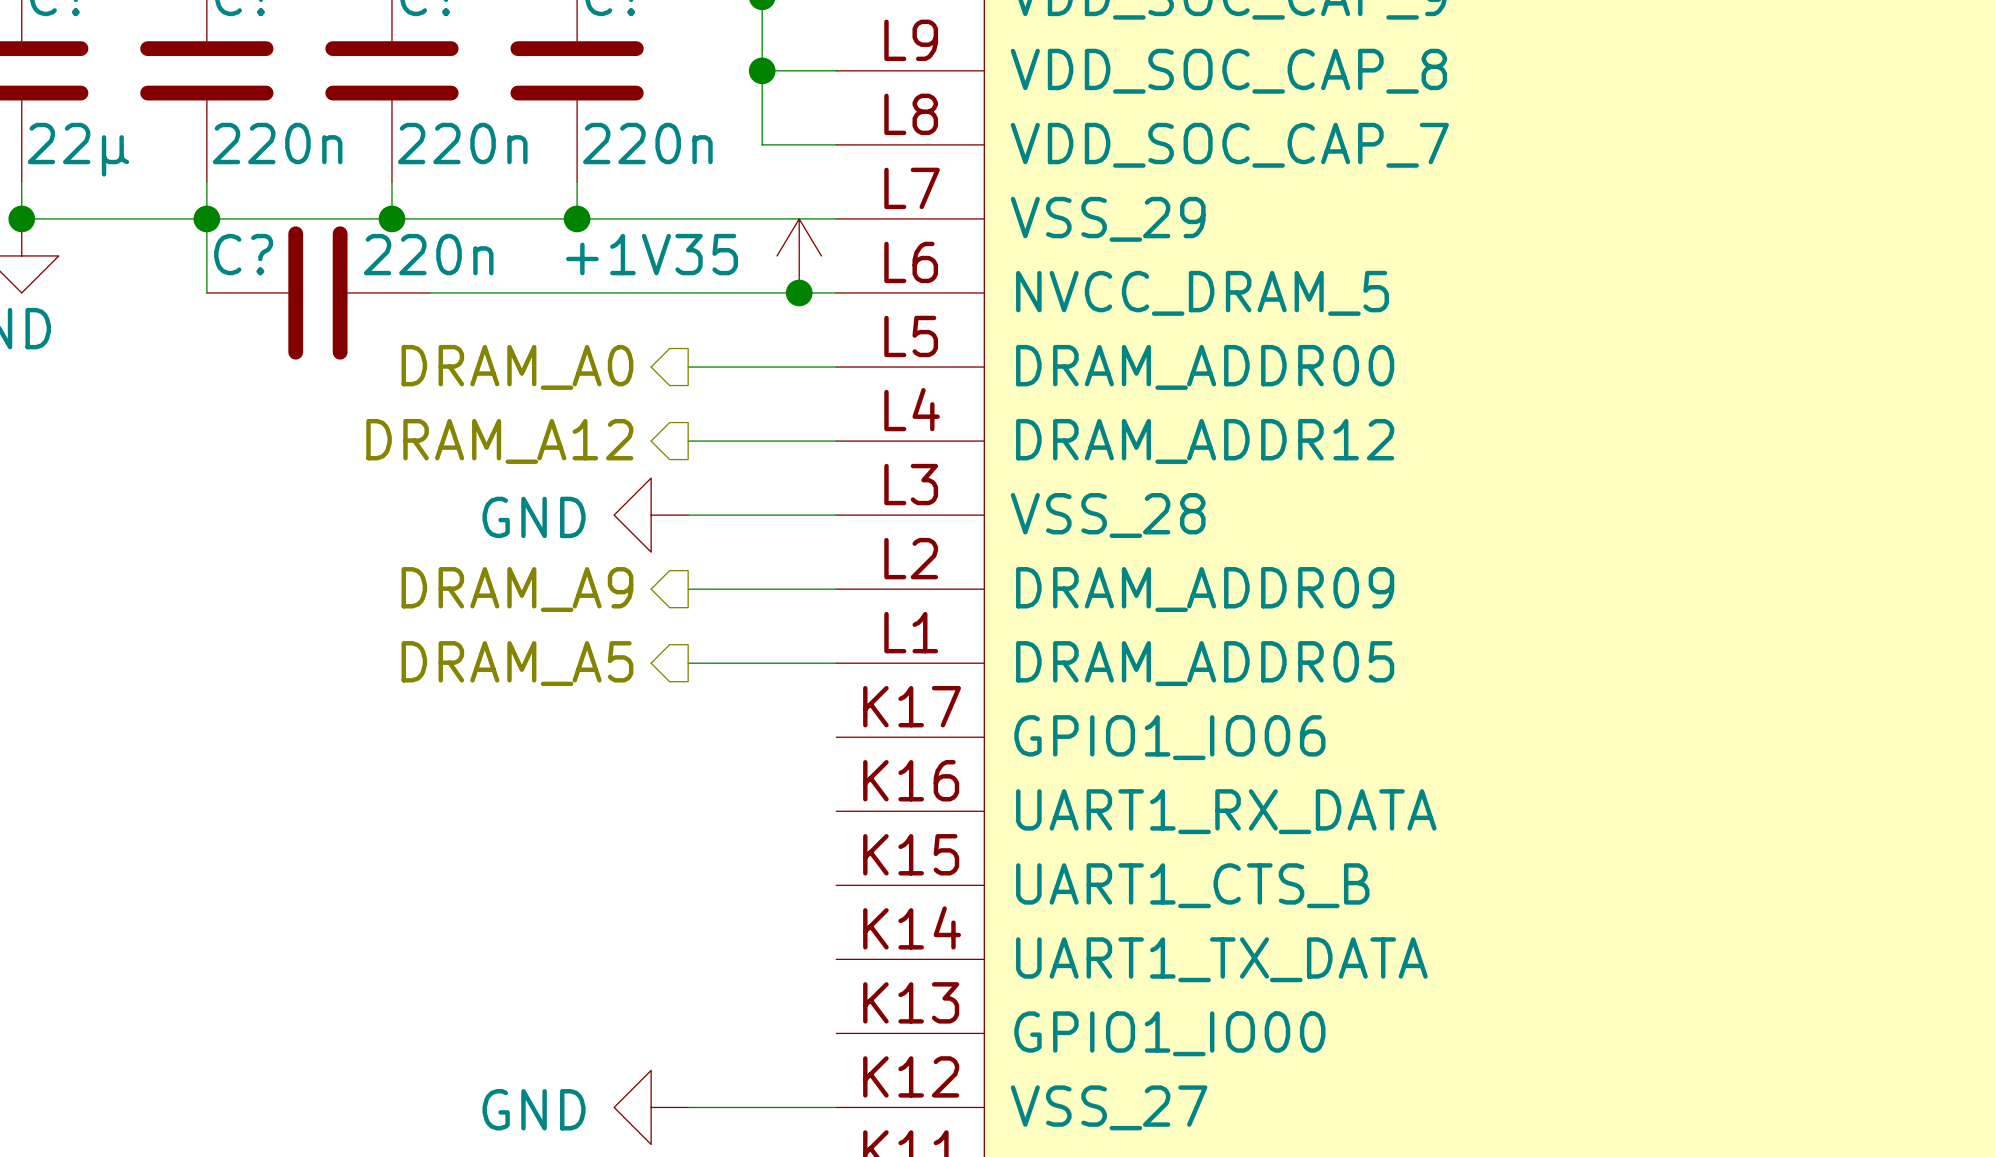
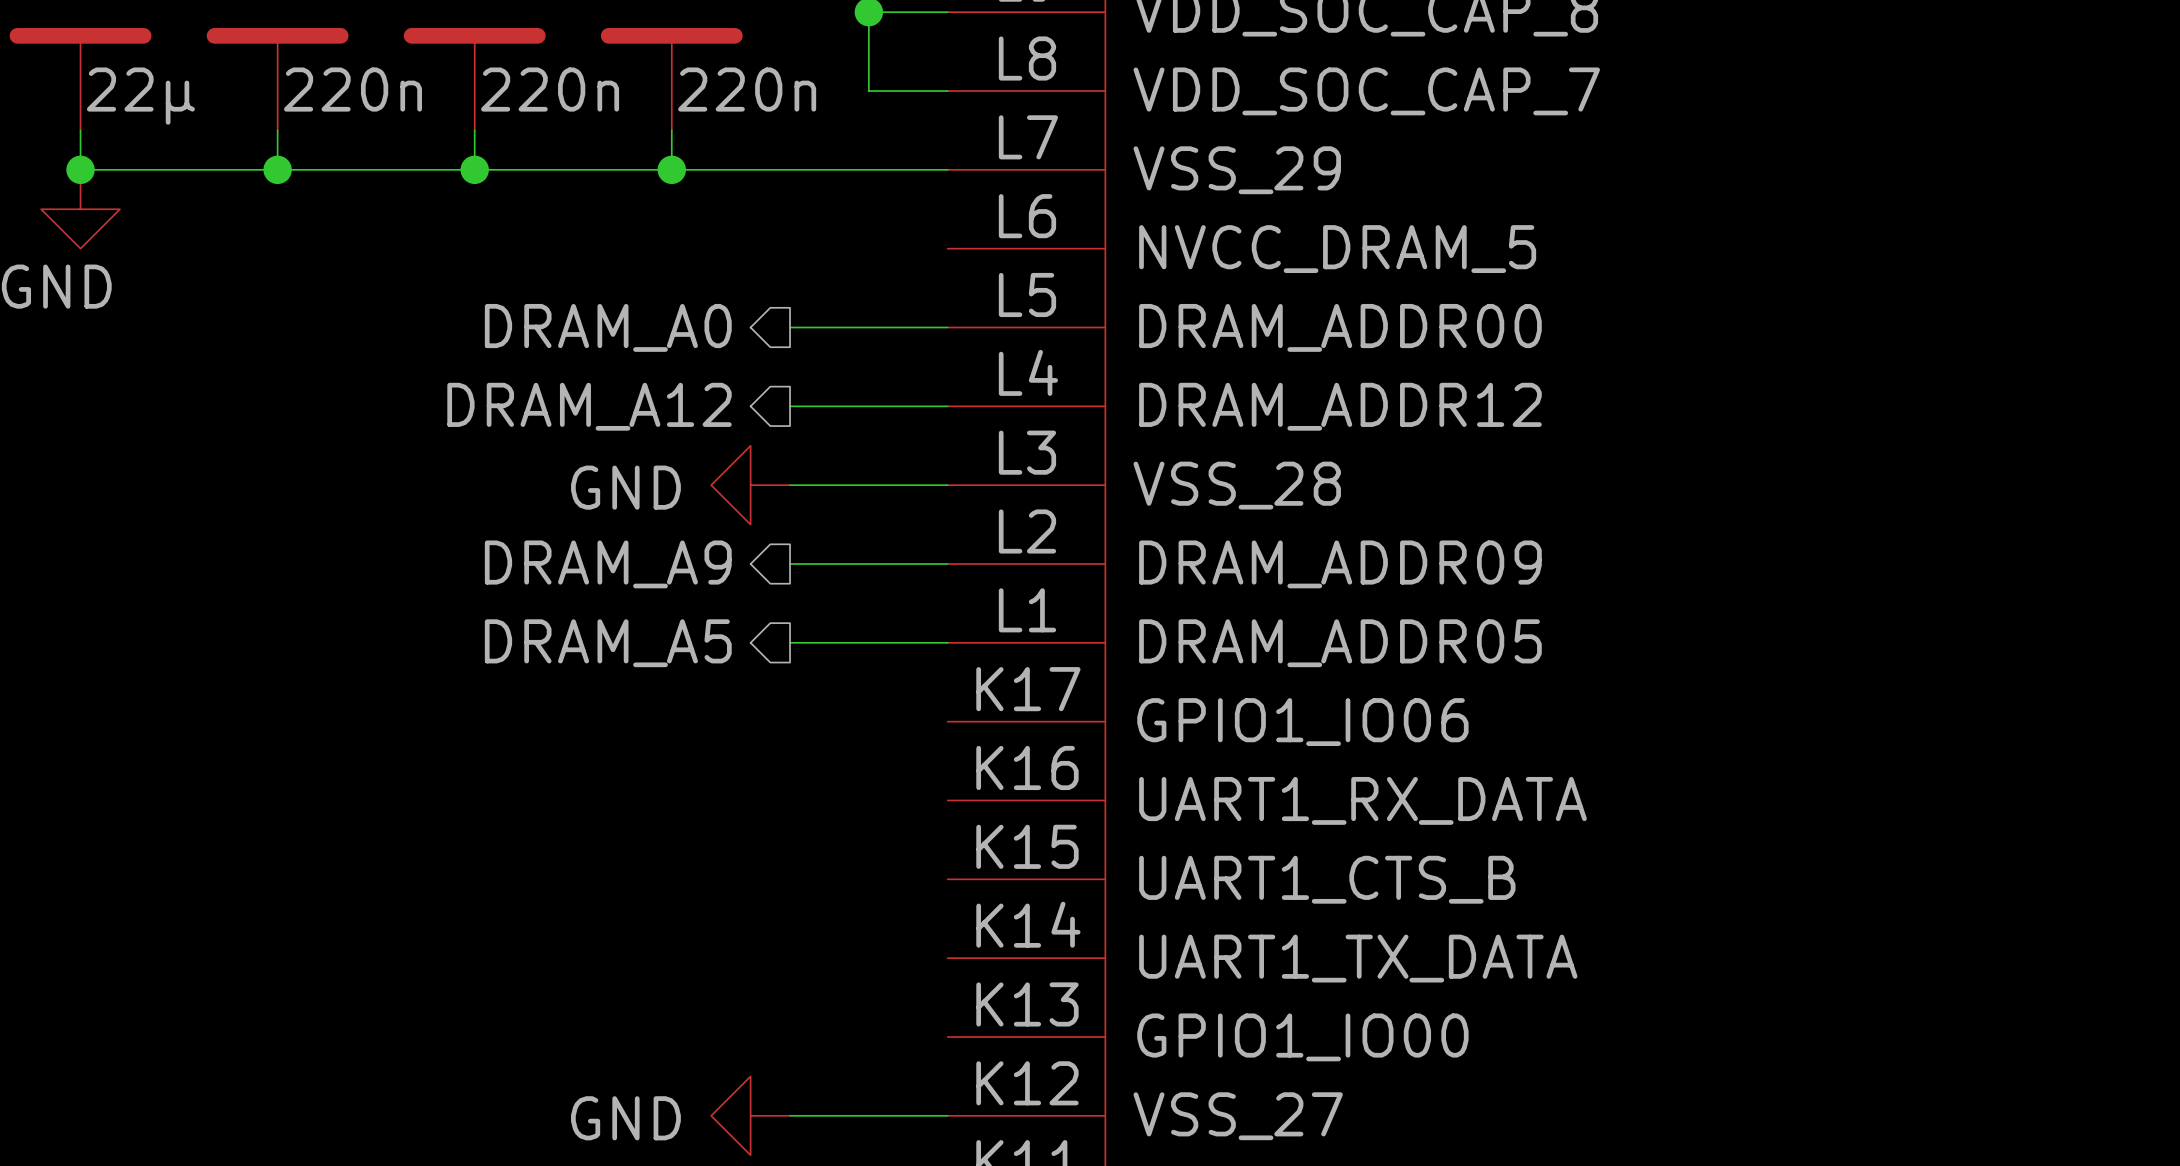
wire: (206, 218) (206, 292) -> none
power symbol: +1V35 (799, 255) -> none
C?: 220n (317, 292) -> none
wire: (429, 292) (836, 292) -> none
junction: (799, 292) -> none

